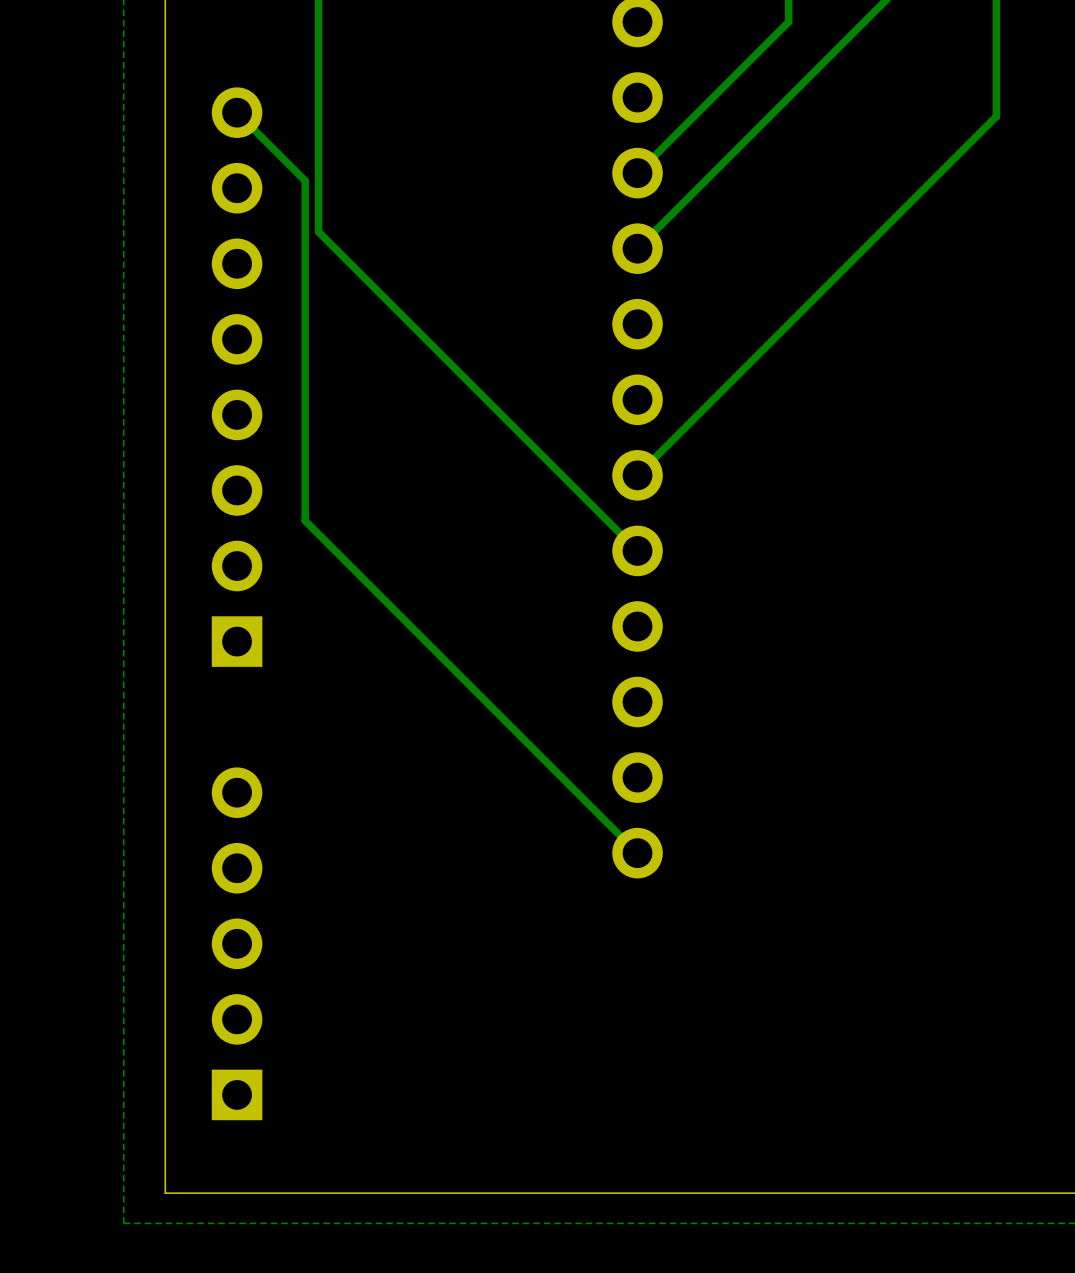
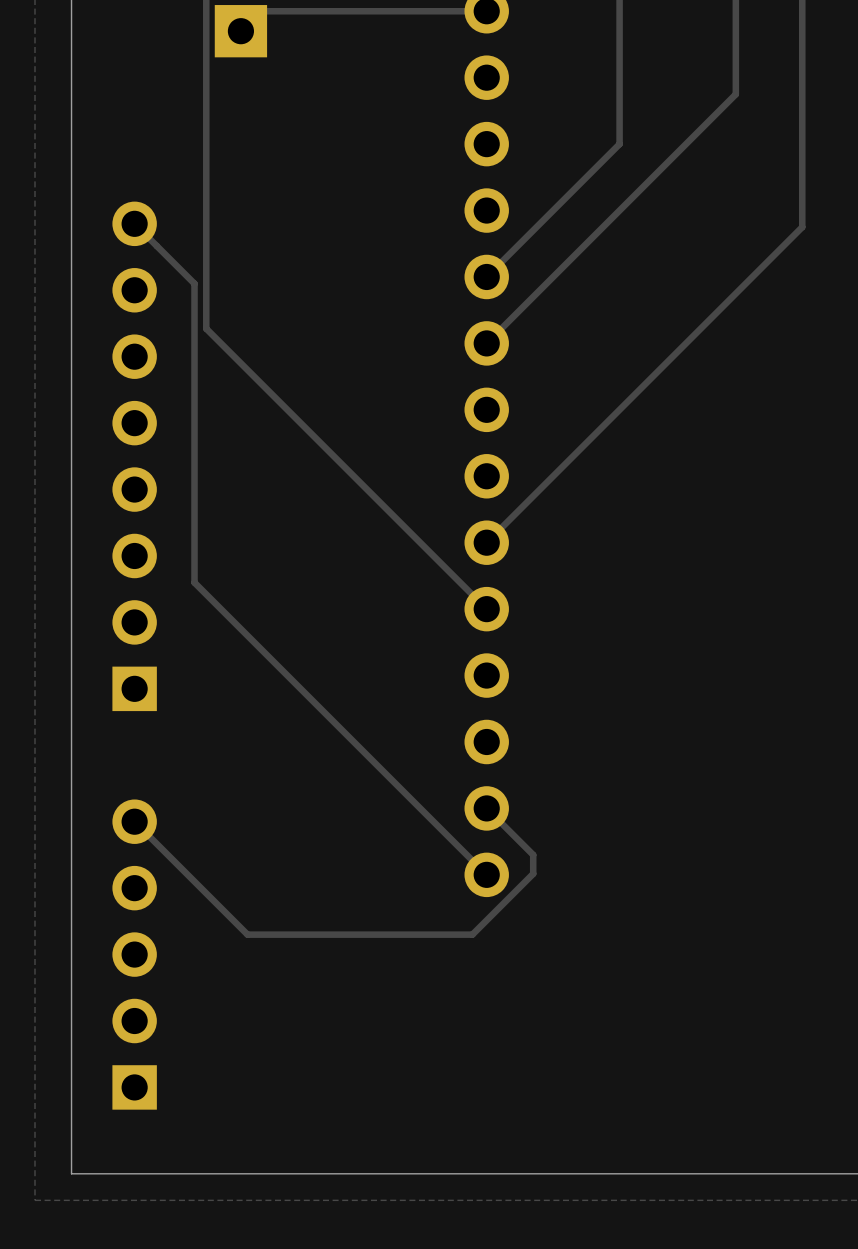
track: none -> (486, 808) (533, 854) (533, 873) (472, 934) (247, 934) (134, 821)

